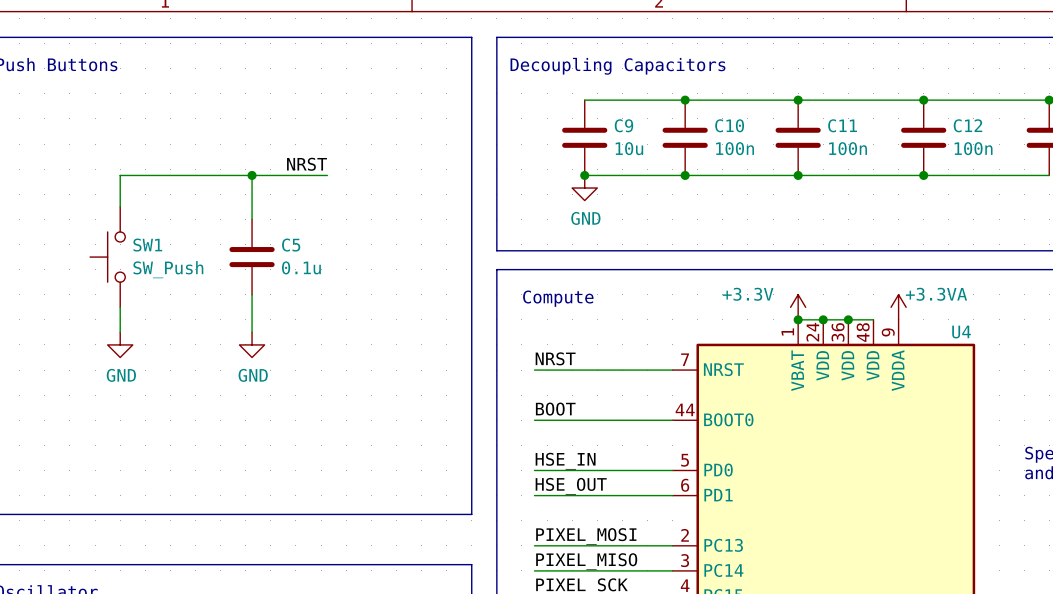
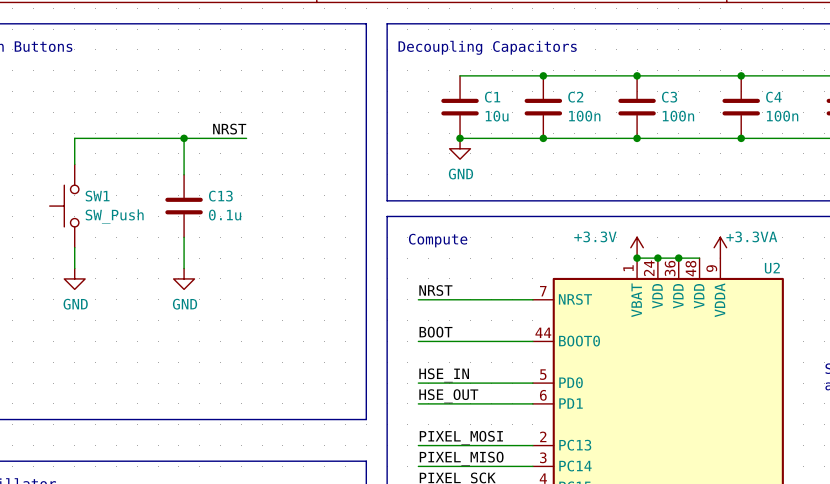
C9 name: C9 (623, 125) -> C1 (492, 97)
C10 name: C10 (729, 125) -> C2 (575, 97)
C11 name: C11 (842, 125) -> C3 (669, 97)
C12 name: C12 (967, 125) -> C4 (773, 97)
C5 name: C5 (291, 245) -> C13 (220, 196)
U4 name: U4 (961, 332) -> U2 (772, 268)

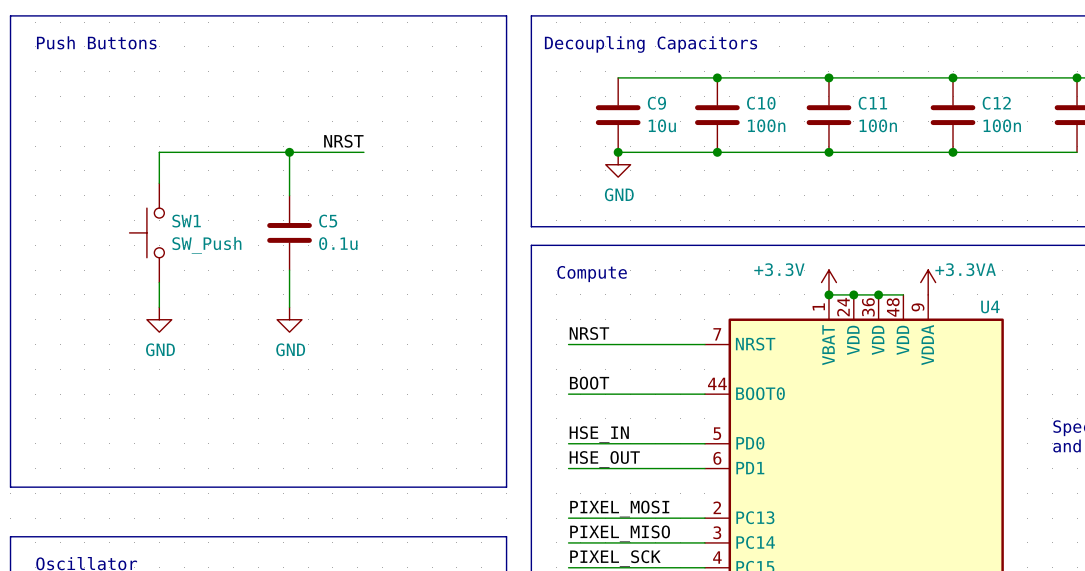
C1 name: C1 (492, 97) -> C9 (656, 103)
C2 name: C2 (575, 97) -> C10 (761, 103)
C3 name: C3 (669, 97) -> C11 (872, 103)
C4 name: C4 (773, 97) -> C12 (996, 103)
C13 name: C13 (220, 196) -> C5 (328, 221)
U2 name: U2 (772, 268) -> U4 (990, 307)

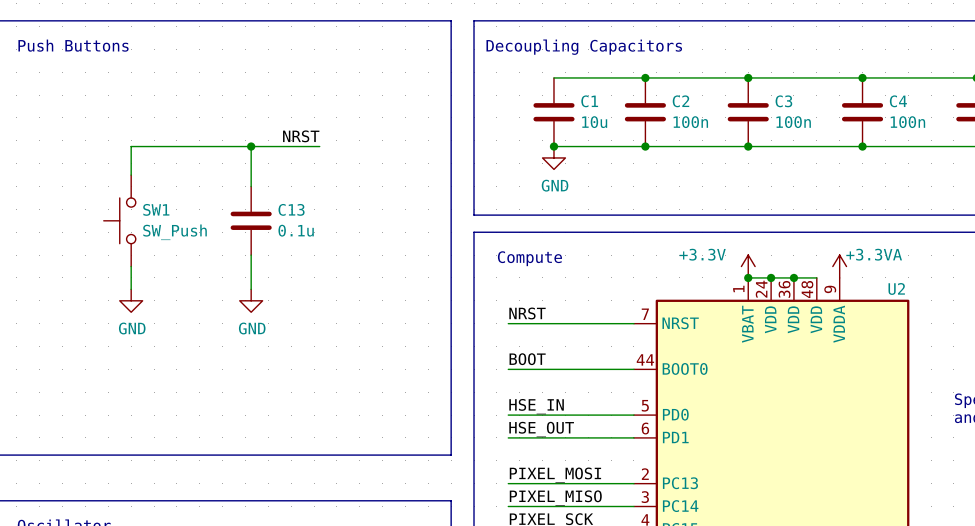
C9 name: C9 (656, 103) -> C1 (589, 101)
C10 name: C10 (761, 103) -> C2 (680, 101)
C11 name: C11 (872, 103) -> C3 (783, 101)
C12 name: C12 (996, 103) -> C4 (898, 101)
C5 name: C5 (328, 221) -> C13 (291, 209)
U4 name: U4 (990, 307) -> U2 (896, 288)

